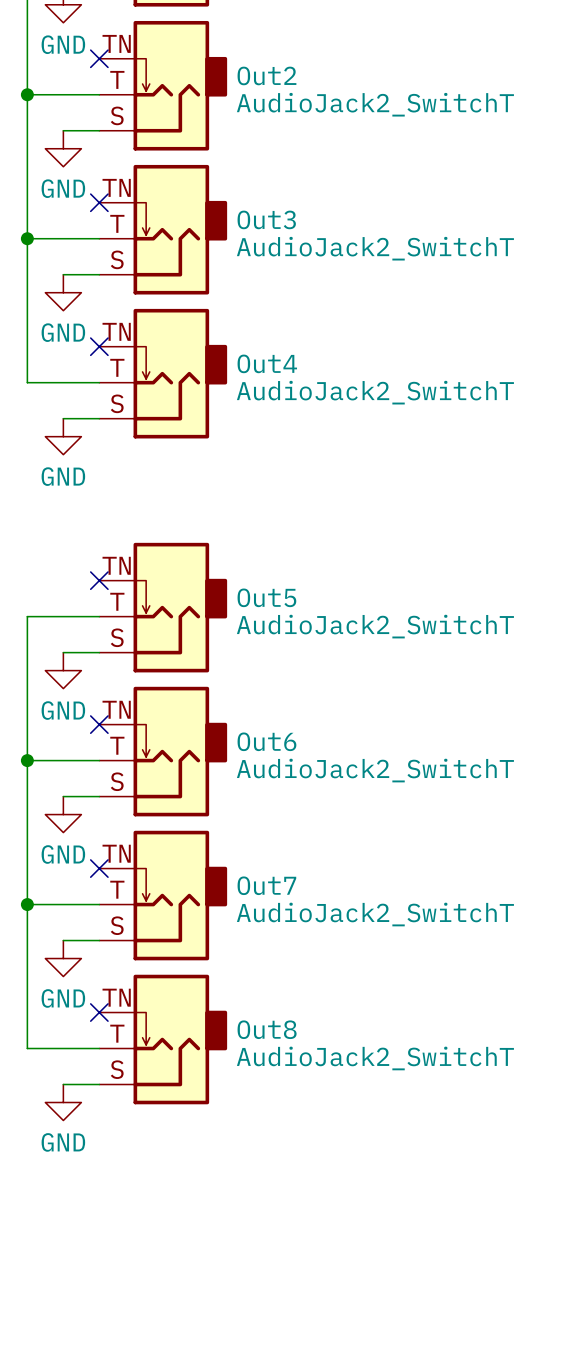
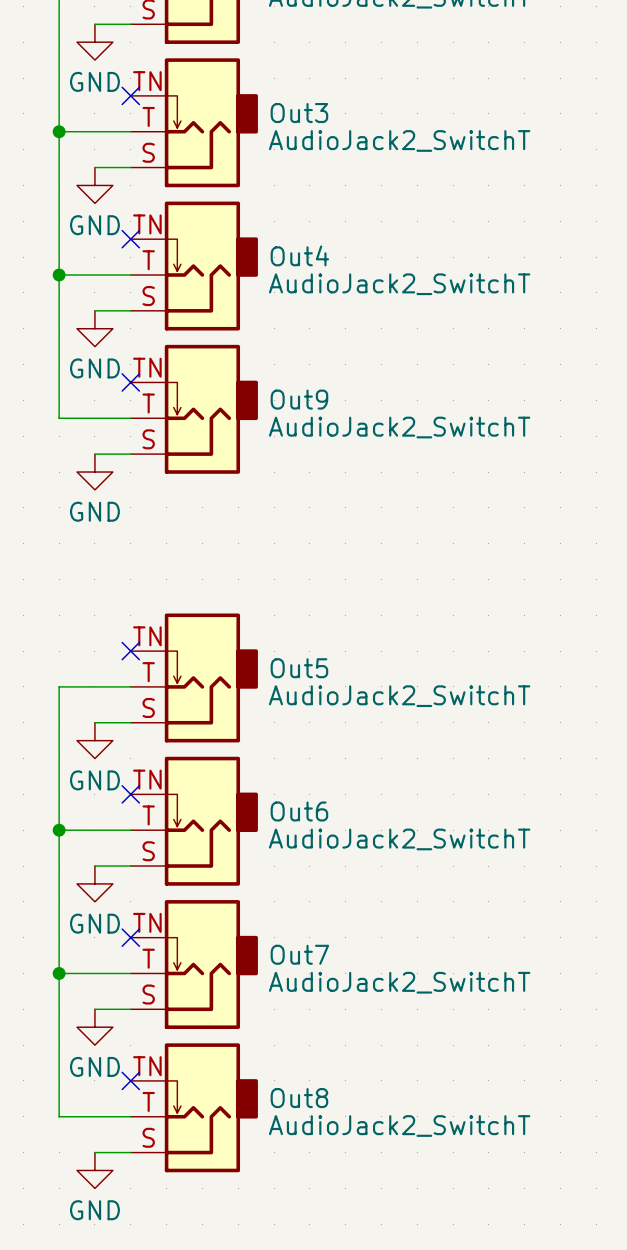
wire: none -> (59, 275) (59, 418) (130, 418)
junction: none -> (59, 275)
no-connect mark: none -> (130, 382)
Out9: none -> AudioJack2_SwitchT (194, 409)
power symbol: none -> GND (94, 472)
no-connect mark: (99, 580) -> none
Out5 position: (163, 607) -> (194, 677)
wire: (99, 616) (27, 616) (27, 796) -> (94, 686) (59, 686)
wire: (63, 652) (99, 652) -> (94, 454) (130, 454)
power symbol: GND (63, 670) -> none
no-connect mark position: (99, 724) -> (130, 651)
Out6 position: (163, 751) -> (194, 821)
wire: (27, 760) (99, 760) -> none
junction: (27, 760) -> none
power symbol position: GND (63, 814) -> GND (94, 740)
wire: none -> (94, 722) (130, 722)
no-connect mark position: (99, 868) -> (130, 794)
Out7 position: (163, 895) -> (194, 964)
wire: (27, 904) (99, 904) -> none
junction position: (27, 904) -> (59, 830)
wire: none -> (59, 830) (94, 830)
power symbol position: GND (63, 958) -> GND (94, 883)
wire: none -> (94, 866) (130, 866)
no-connect mark position: (99, 1012) -> (130, 937)
Out8 position: (163, 1039) -> (194, 1107)
wire: (27, 1048) (99, 1048) -> (59, 937) (59, 1116) (130, 1116)
wire: none -> (59, 973) (94, 973)
junction: none -> (59, 973)
power symbol position: GND (63, 1102) -> GND (94, 1027)
wire: none -> (94, 1009) (130, 1009)
no-connect mark: none -> (130, 1080)
wire: none -> (94, 1152) (130, 1152)
power symbol: none -> GND (94, 1170)

